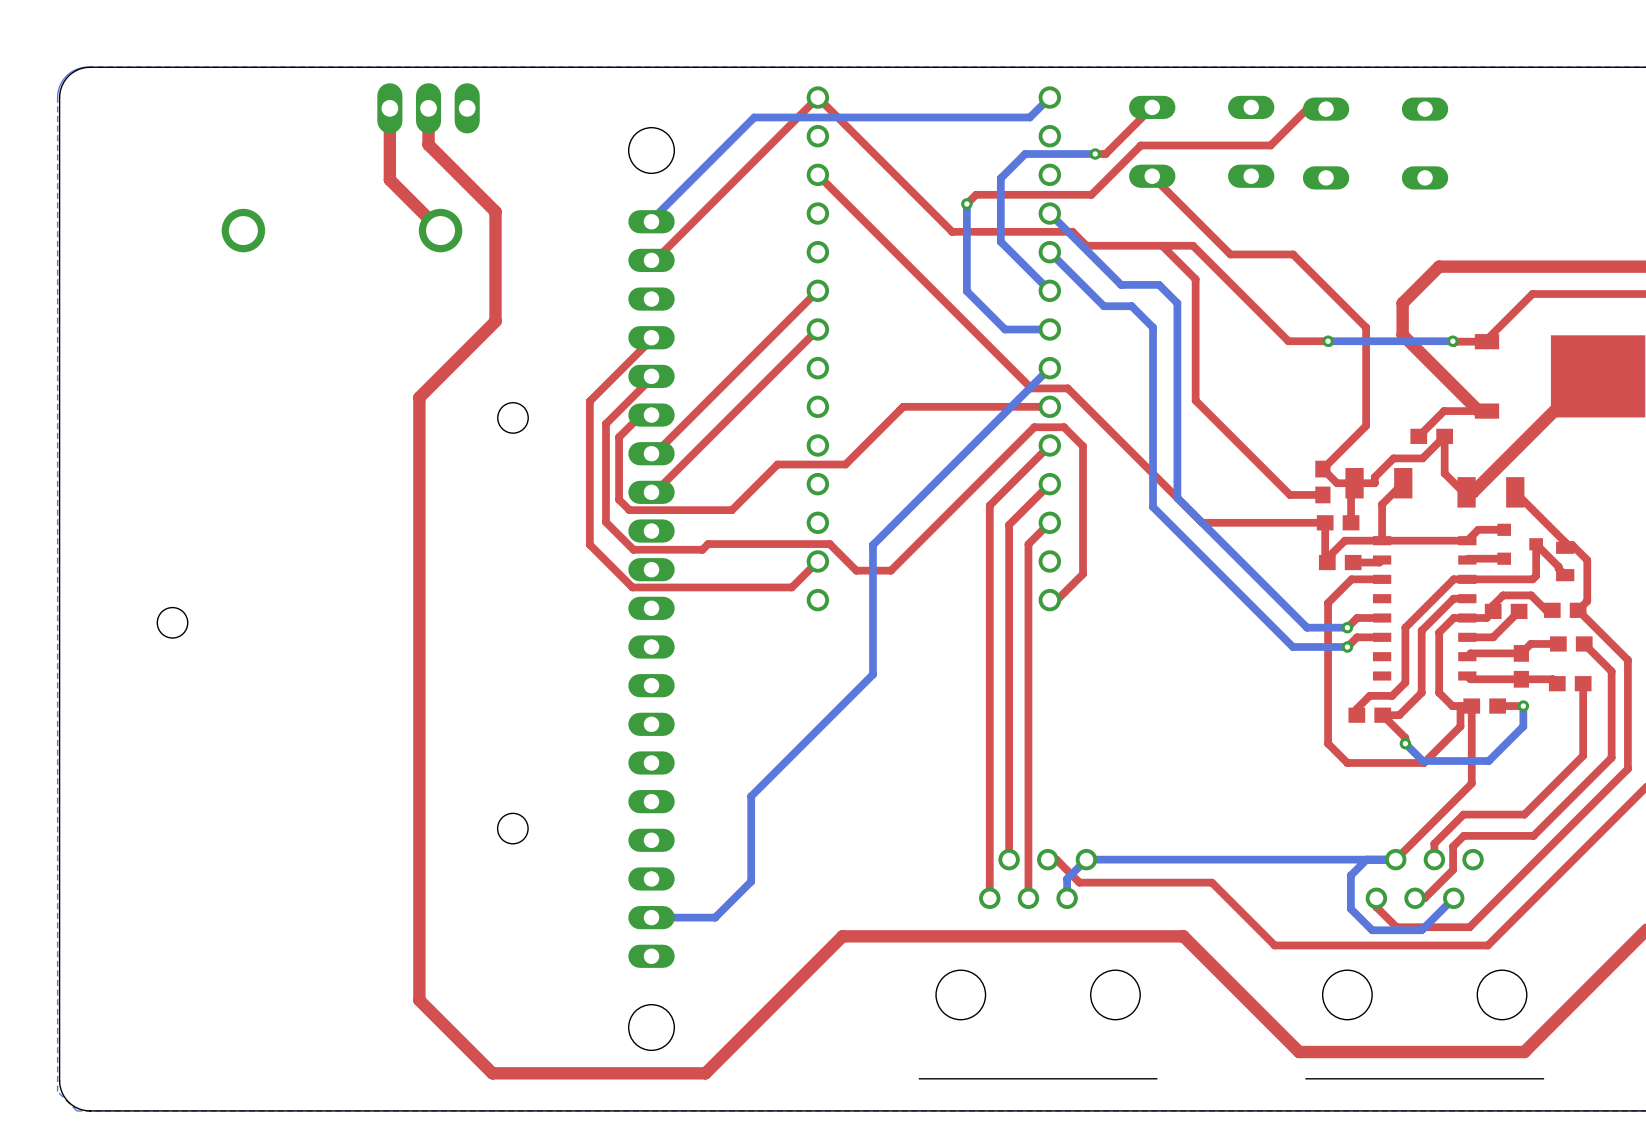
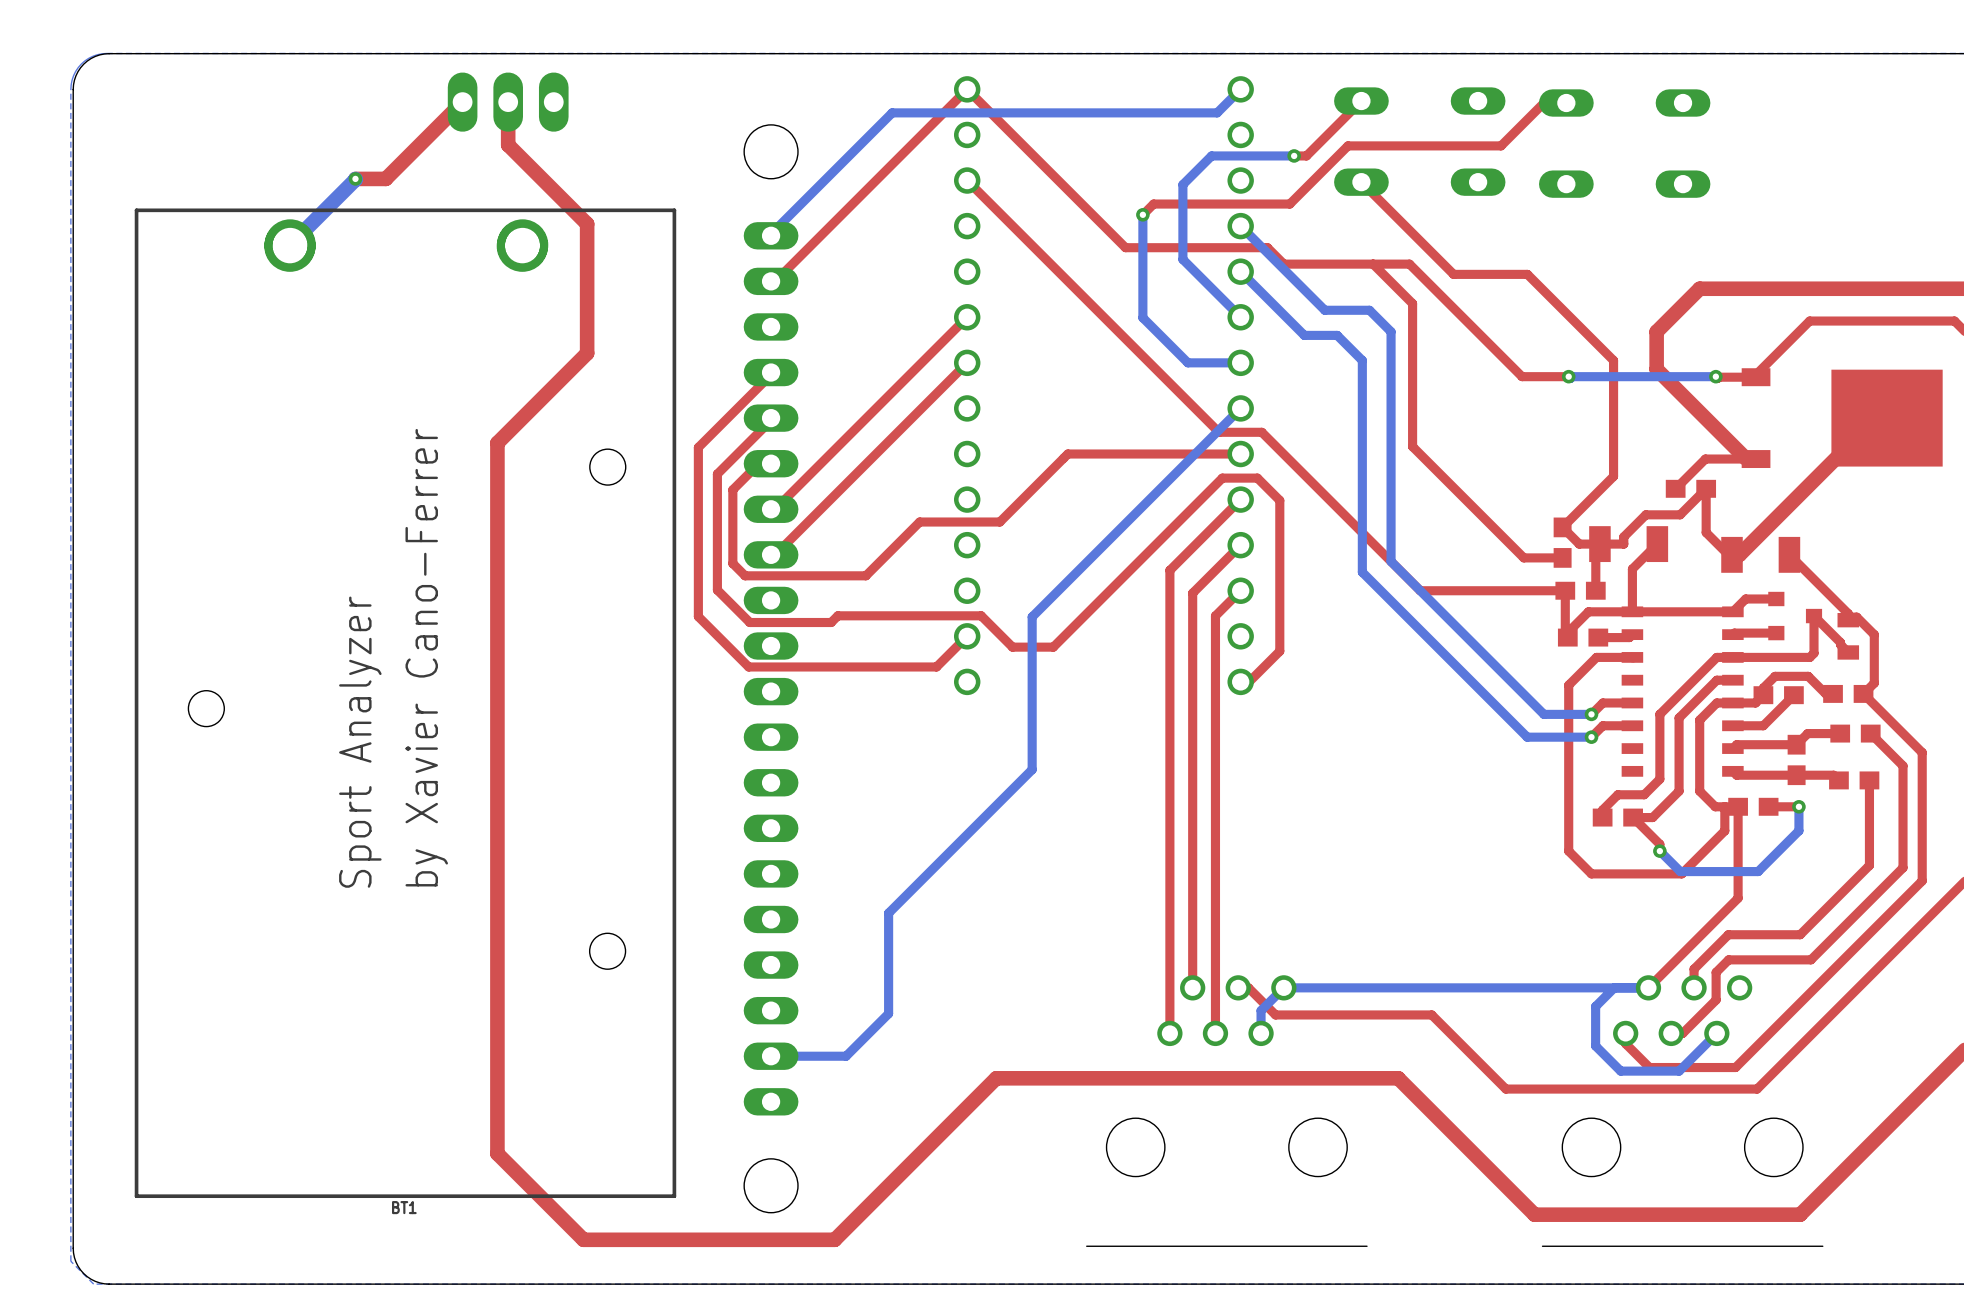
top track: (389, 108) (389, 179) (440, 230) -> (462, 102) (385, 178) (355, 178)
bottom track: none -> (355, 178) (290, 244)
via: none -> (355, 178)
text: none -> by Xavier Cano-Ferrer (426, 657)
BT1: none -> (405, 703)
text: none -> Sport Analyzer (360, 742)

